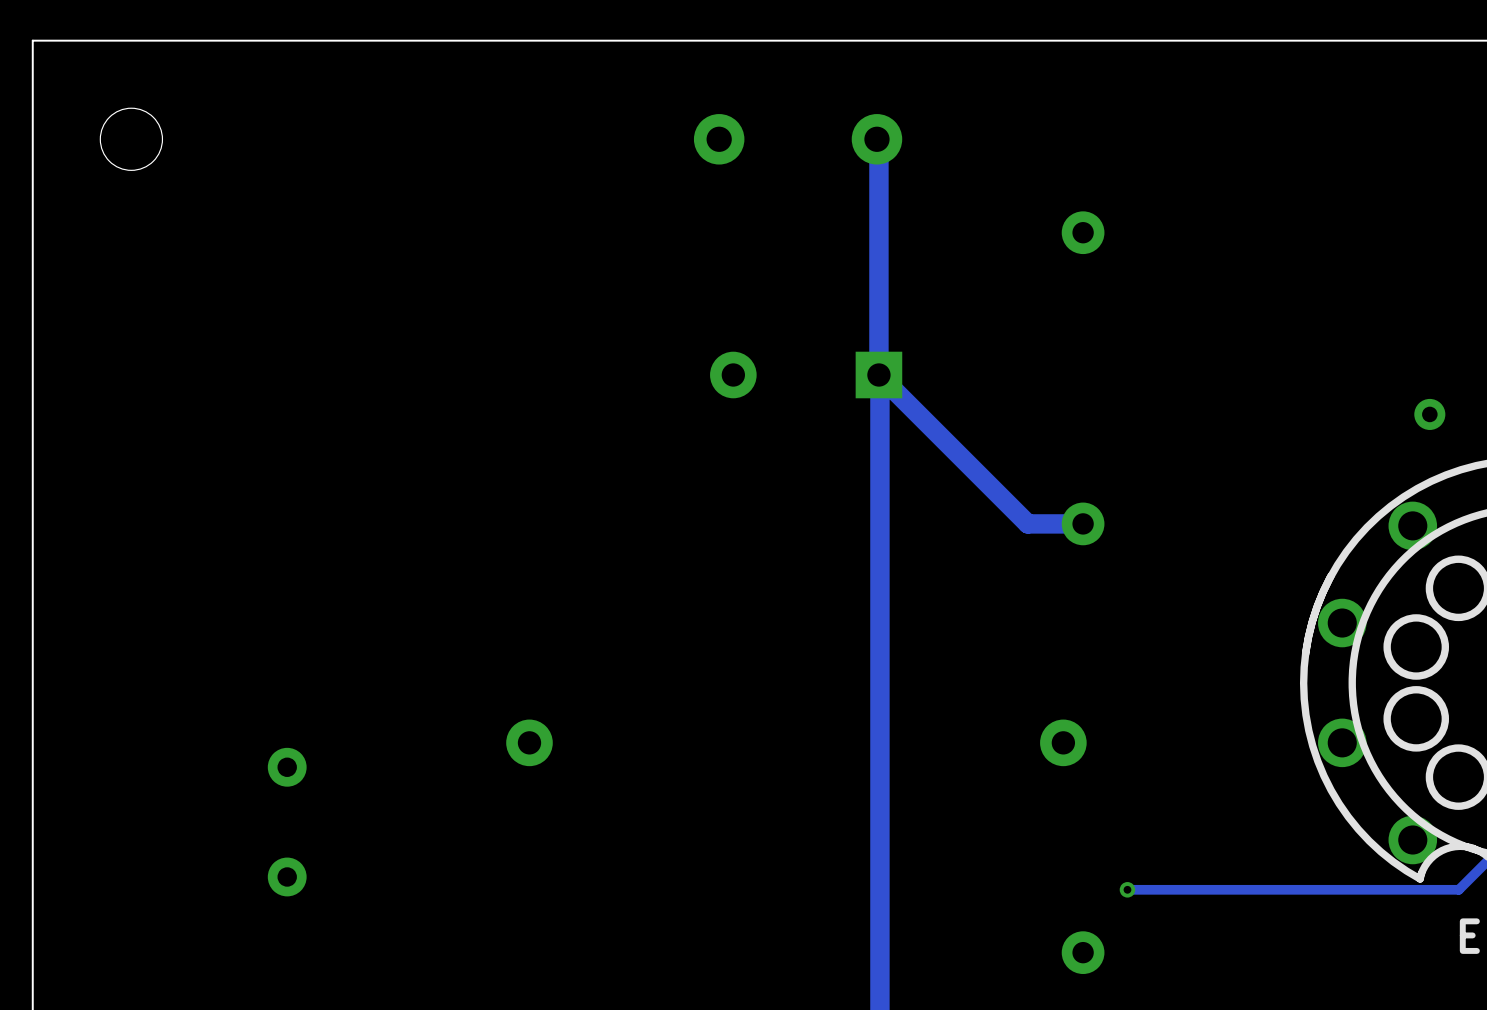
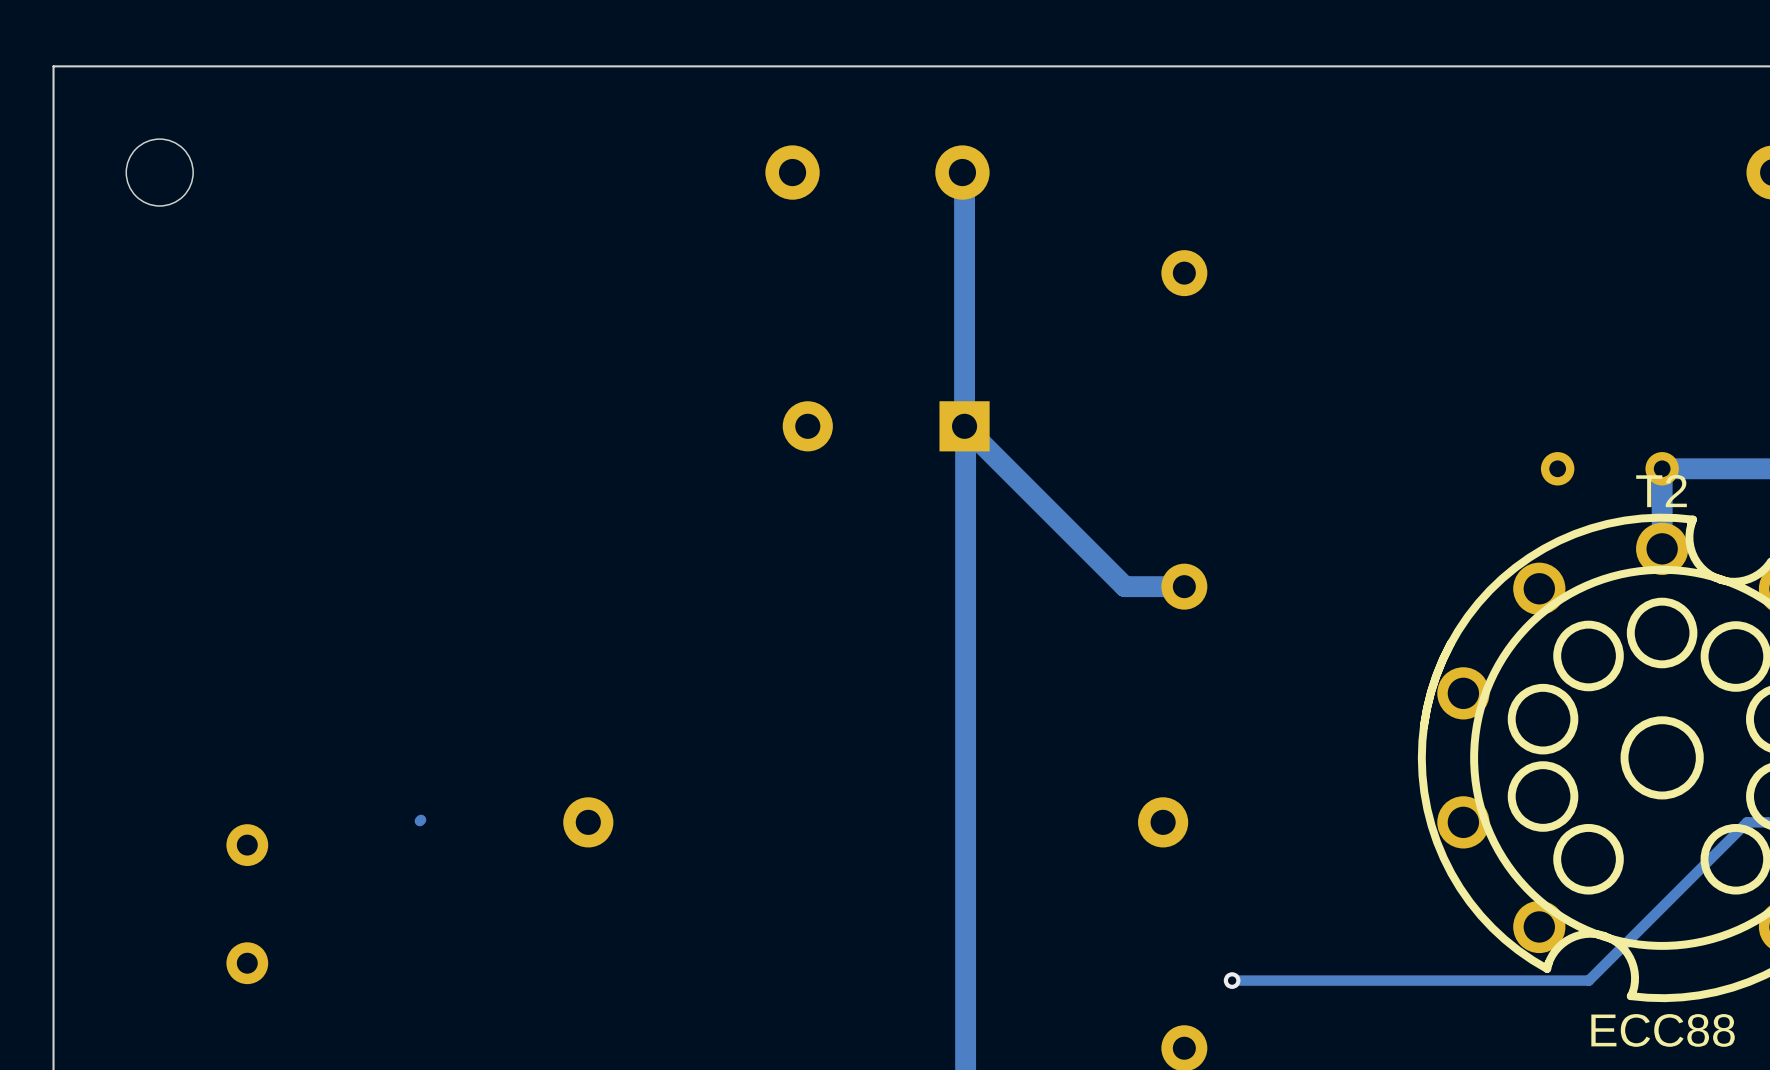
track: none -> (421, 819) (419, 821)
part: none -> (247, 845)
part: (287, 767) -> none
part: none -> (247, 963)
part: (287, 876) -> none

